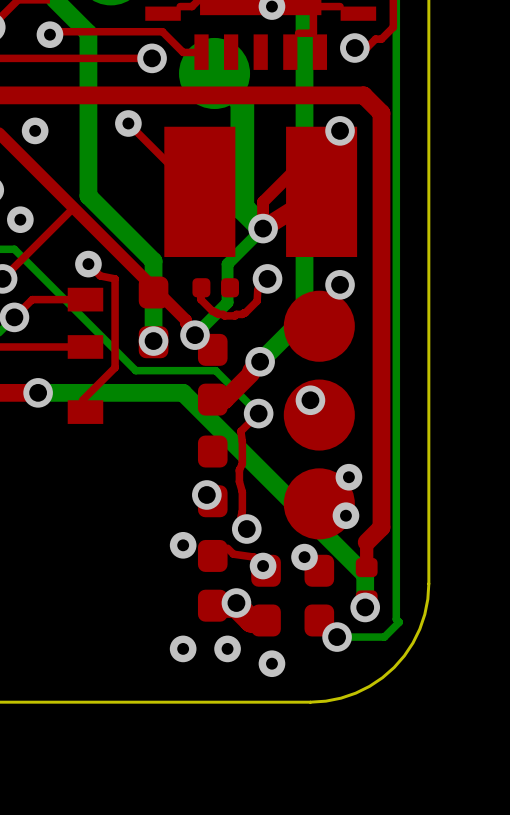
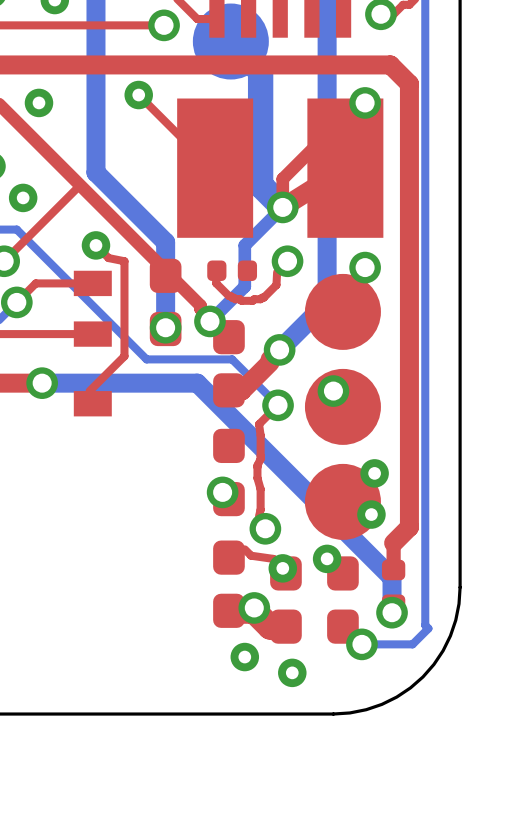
via: (183, 545) -> none
via: (183, 648) -> none

